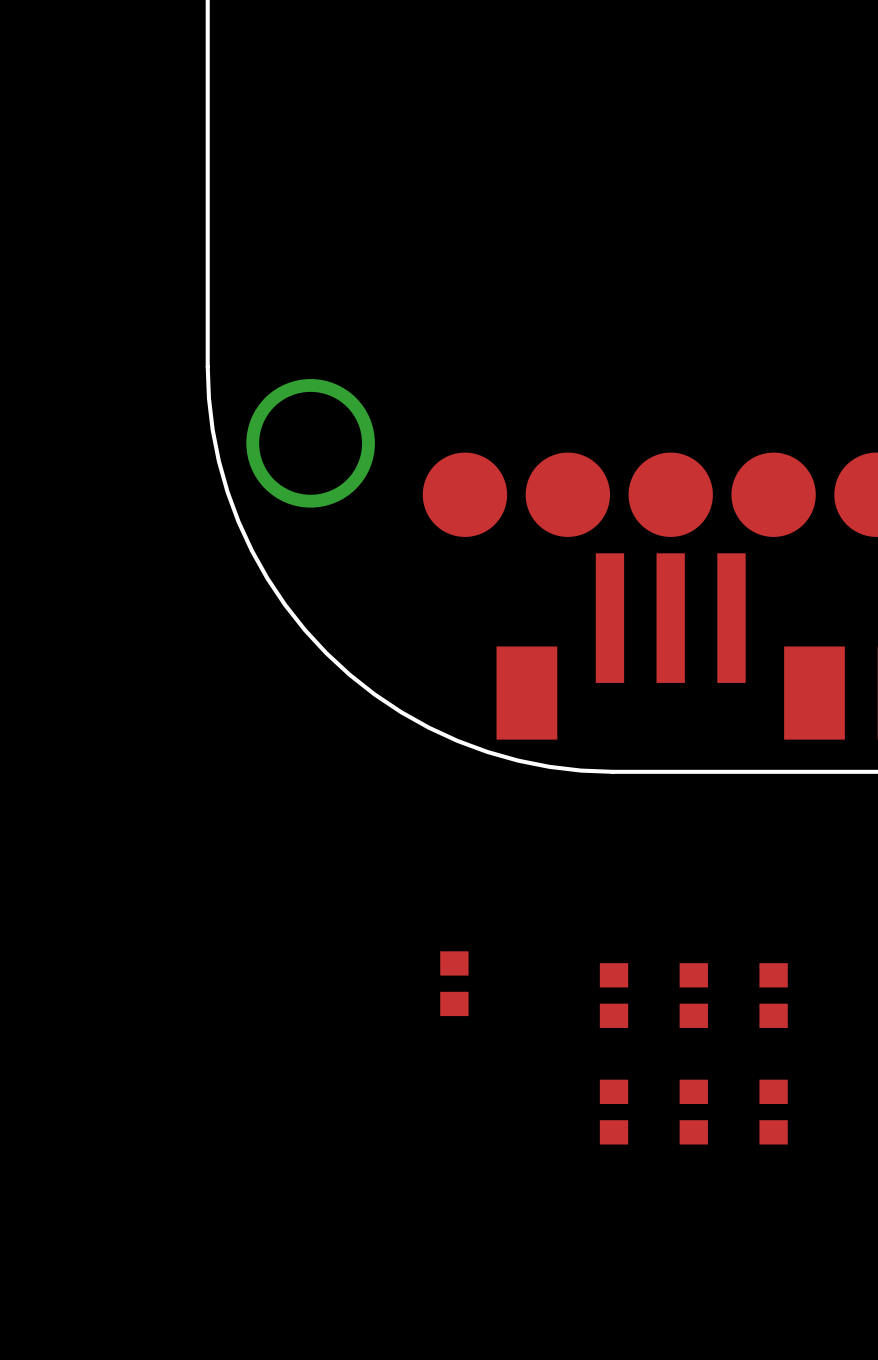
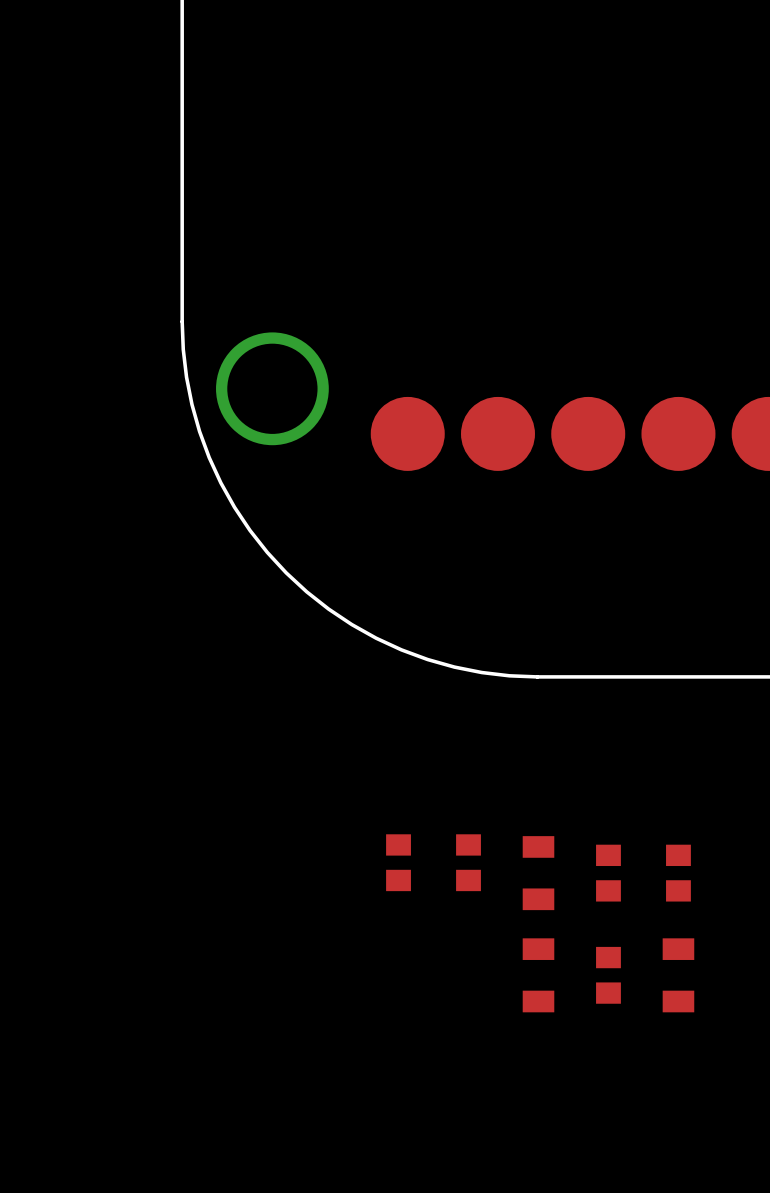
part: (670, 646) -> none
part footprint: [599, 963, 629, 1028] -> [522, 836, 555, 911]
part: none -> (468, 862)
part footprint: [599, 1079, 629, 1145] -> [522, 938, 555, 1013]
part footprint: [759, 1079, 788, 1145] -> [662, 938, 695, 1013]

